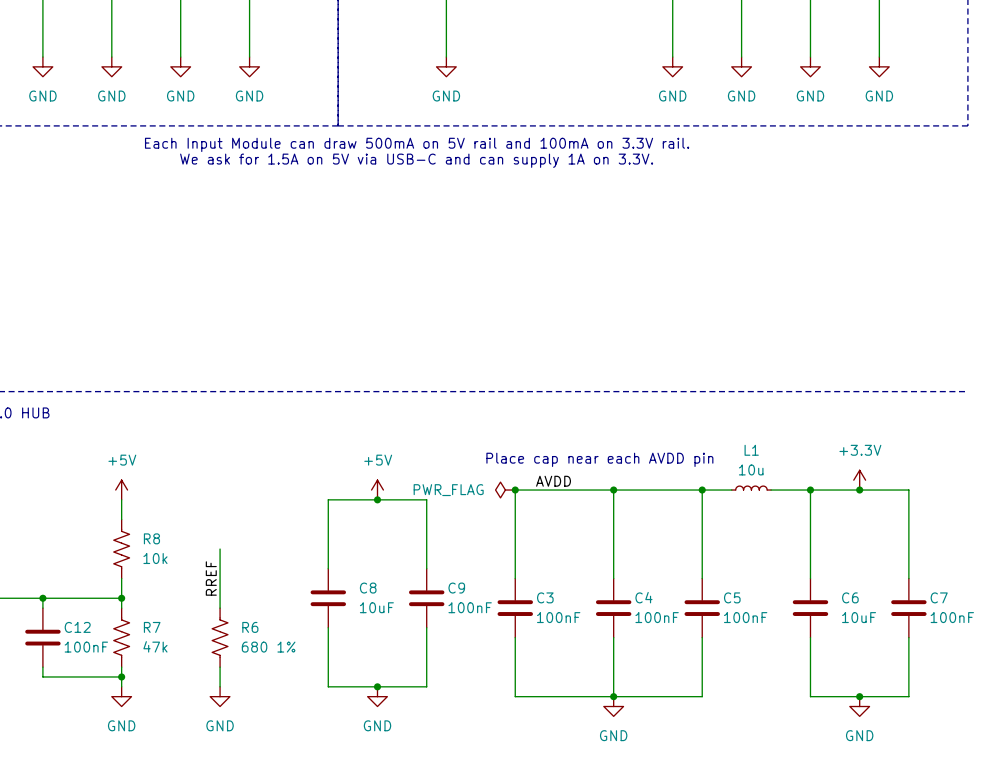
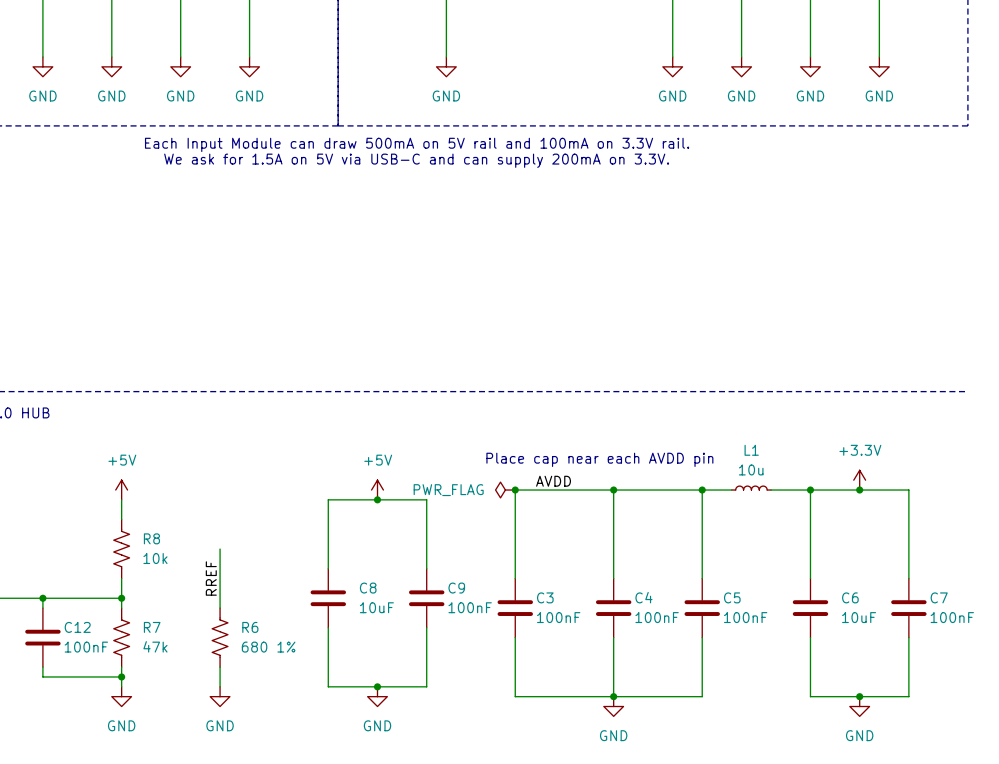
text: We ask for 1.5A on 5V via USB-C and can supply 1A on 3.3V. (416, 160) -> We ask for 1.5A on 5V via USB-C and can supply 200mA on 3.3V. (416, 160)

